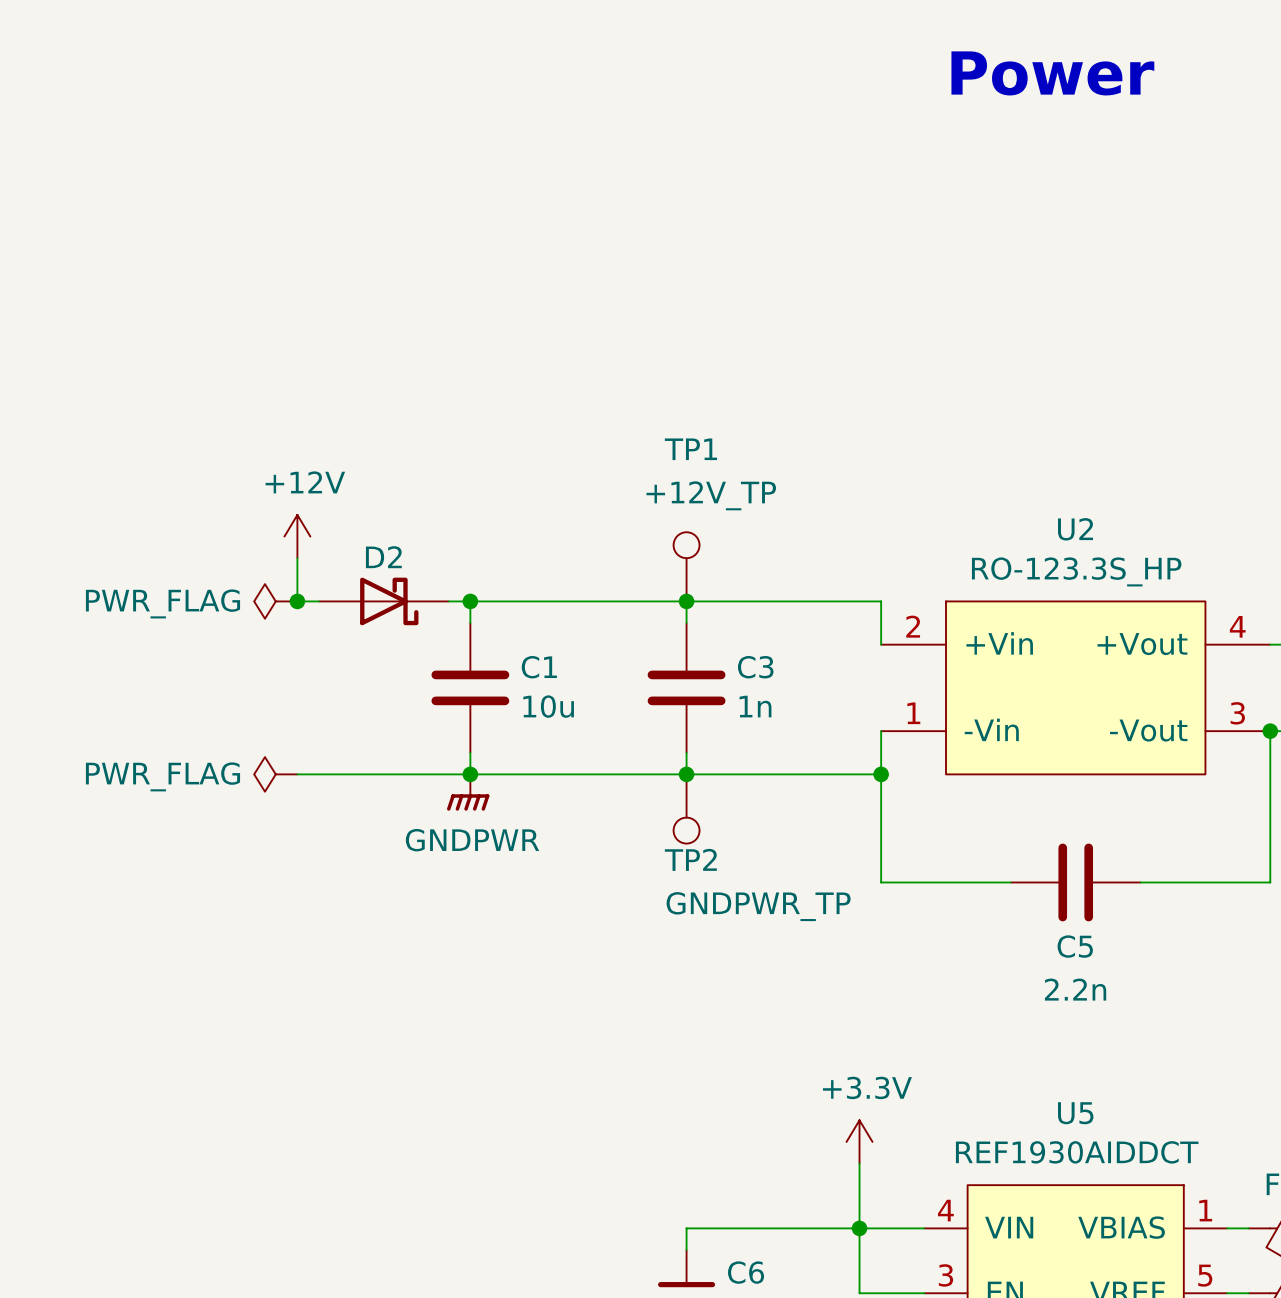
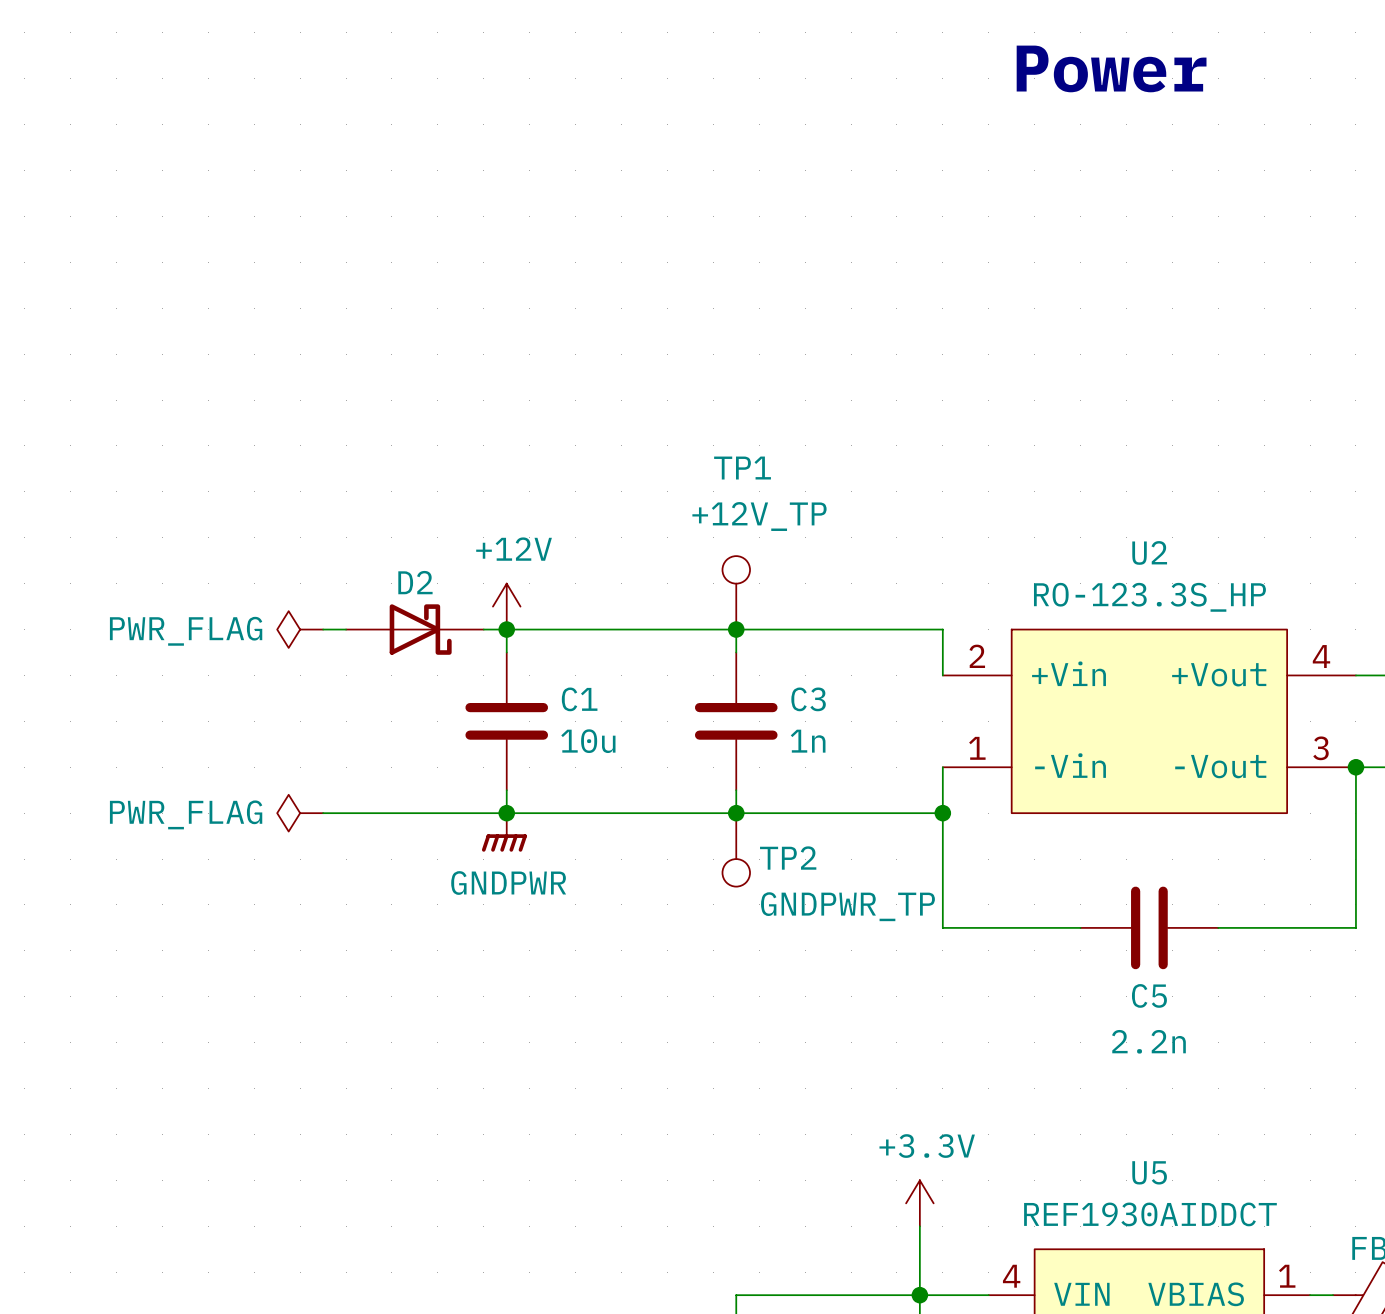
power symbol position: +12V (297, 536) -> +12V (506, 606)
wire: (297, 558) (297, 601) -> none
junction: (297, 601) -> none
TP2 name position: TP2 (690, 859) -> TP2 (788, 858)
TP2 value position: GNDPWR_TP (758, 906) -> GNDPWR_TP (847, 906)

